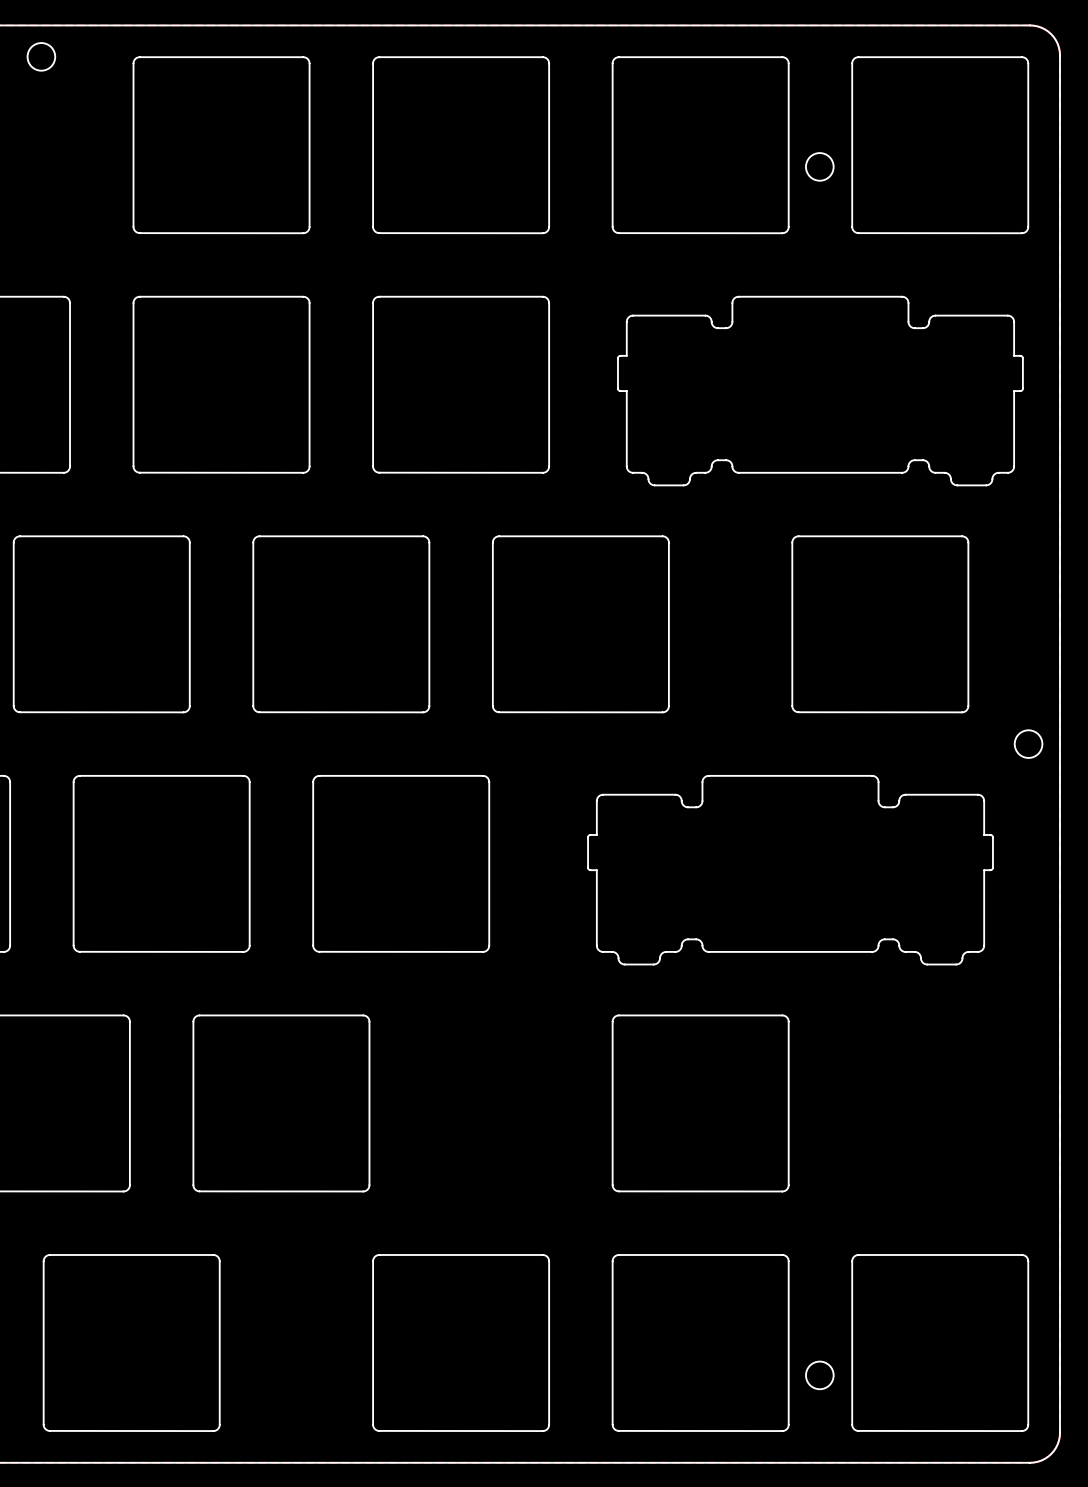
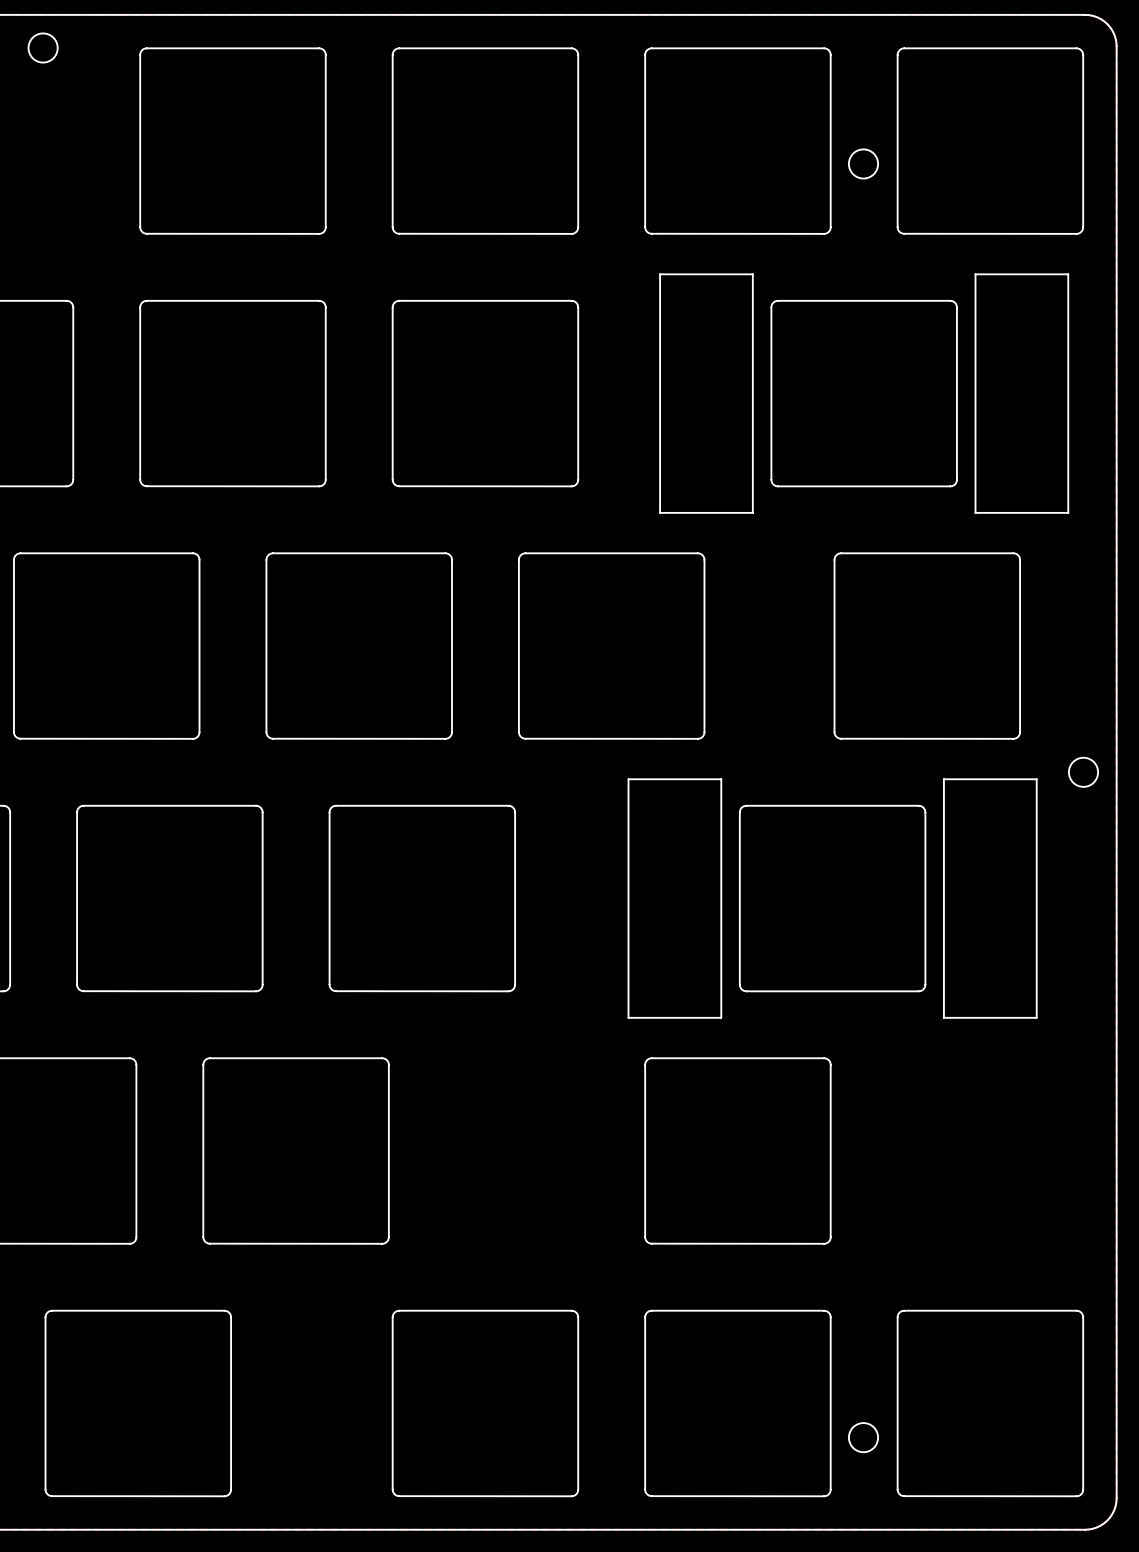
drawing shape: [617, 296, 1024, 487] -> [659, 273, 1070, 514]
drawing shape: [587, 775, 994, 966] -> [627, 778, 1038, 1019]

